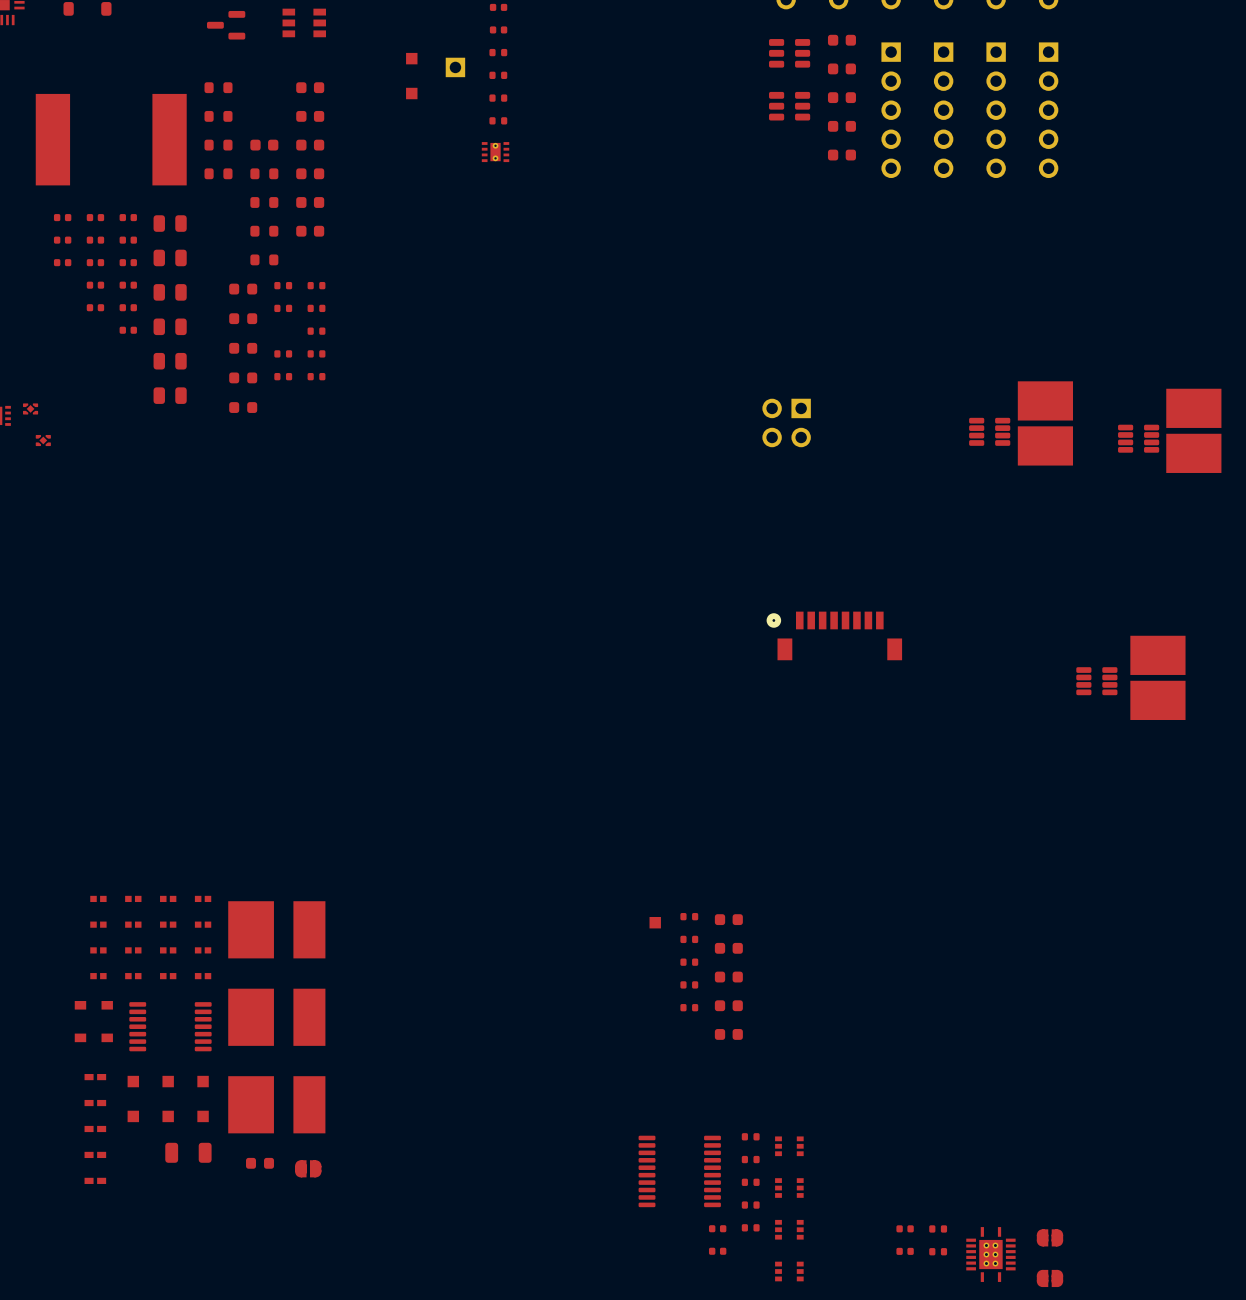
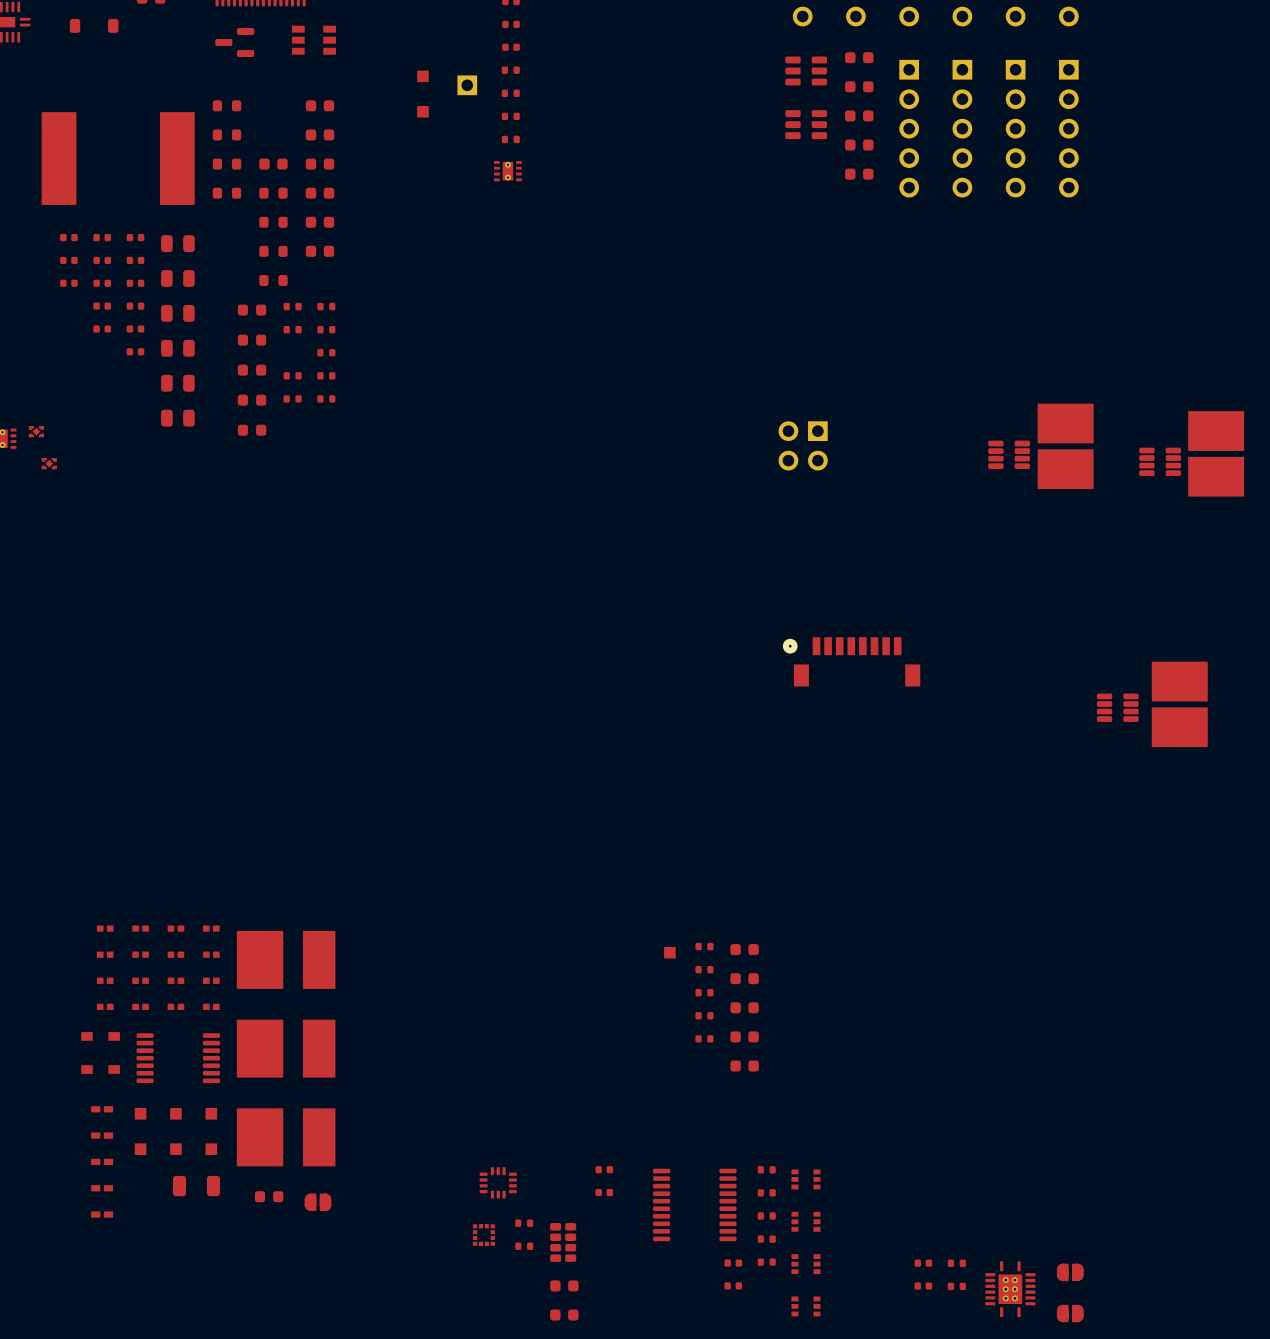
part: none -> (604, 1169)
part: none -> (498, 1182)
part: none -> (604, 1192)
part: none -> (524, 1223)
part: none -> (483, 1235)
part: none -> (563, 1242)
part: none -> (524, 1246)
part: none -> (564, 1285)
part: none -> (564, 1315)

